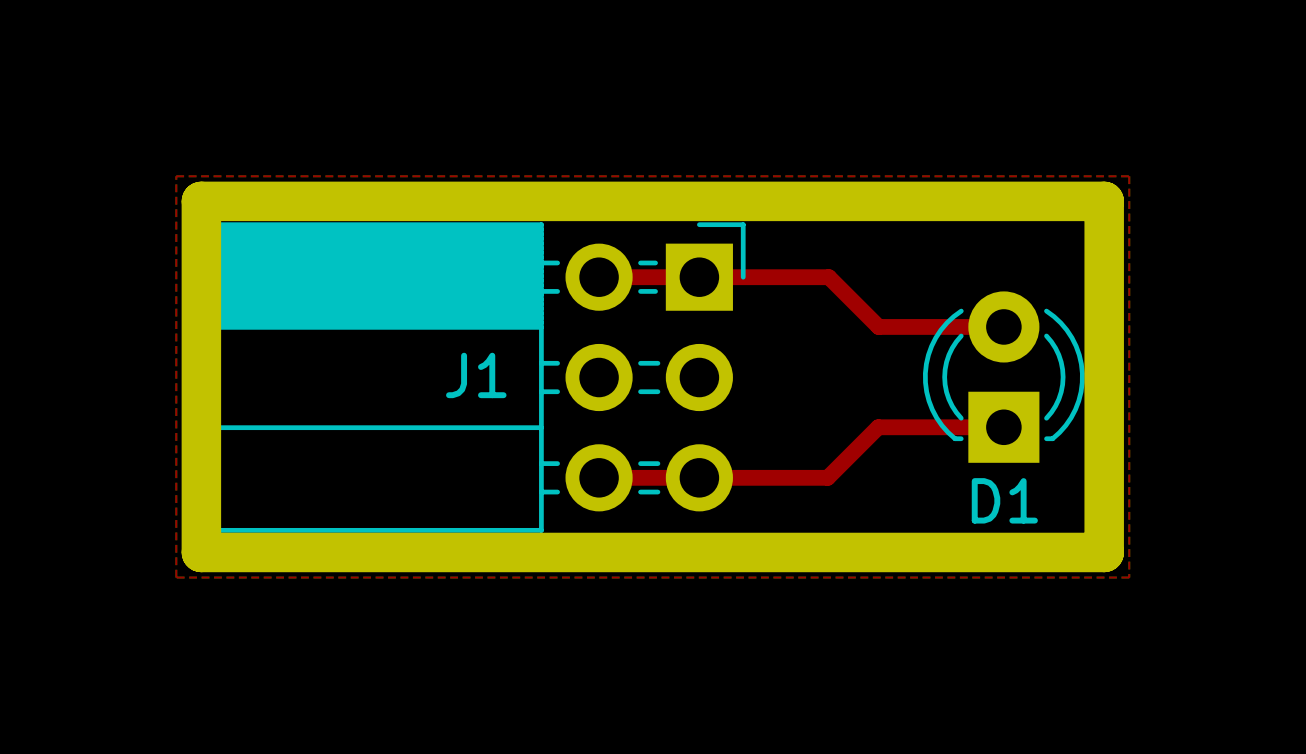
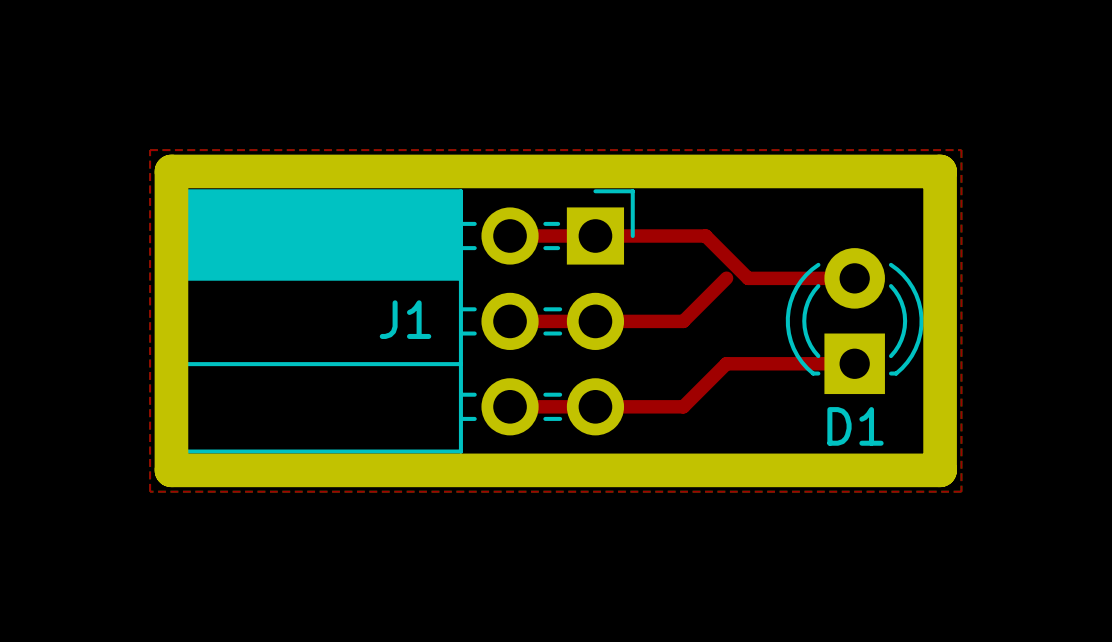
top track: none -> (726, 278) (683, 321) (510, 321)
top track: (878, 427) (827, 477) (802, 477) -> (747, 363) (726, 363) (683, 406)

